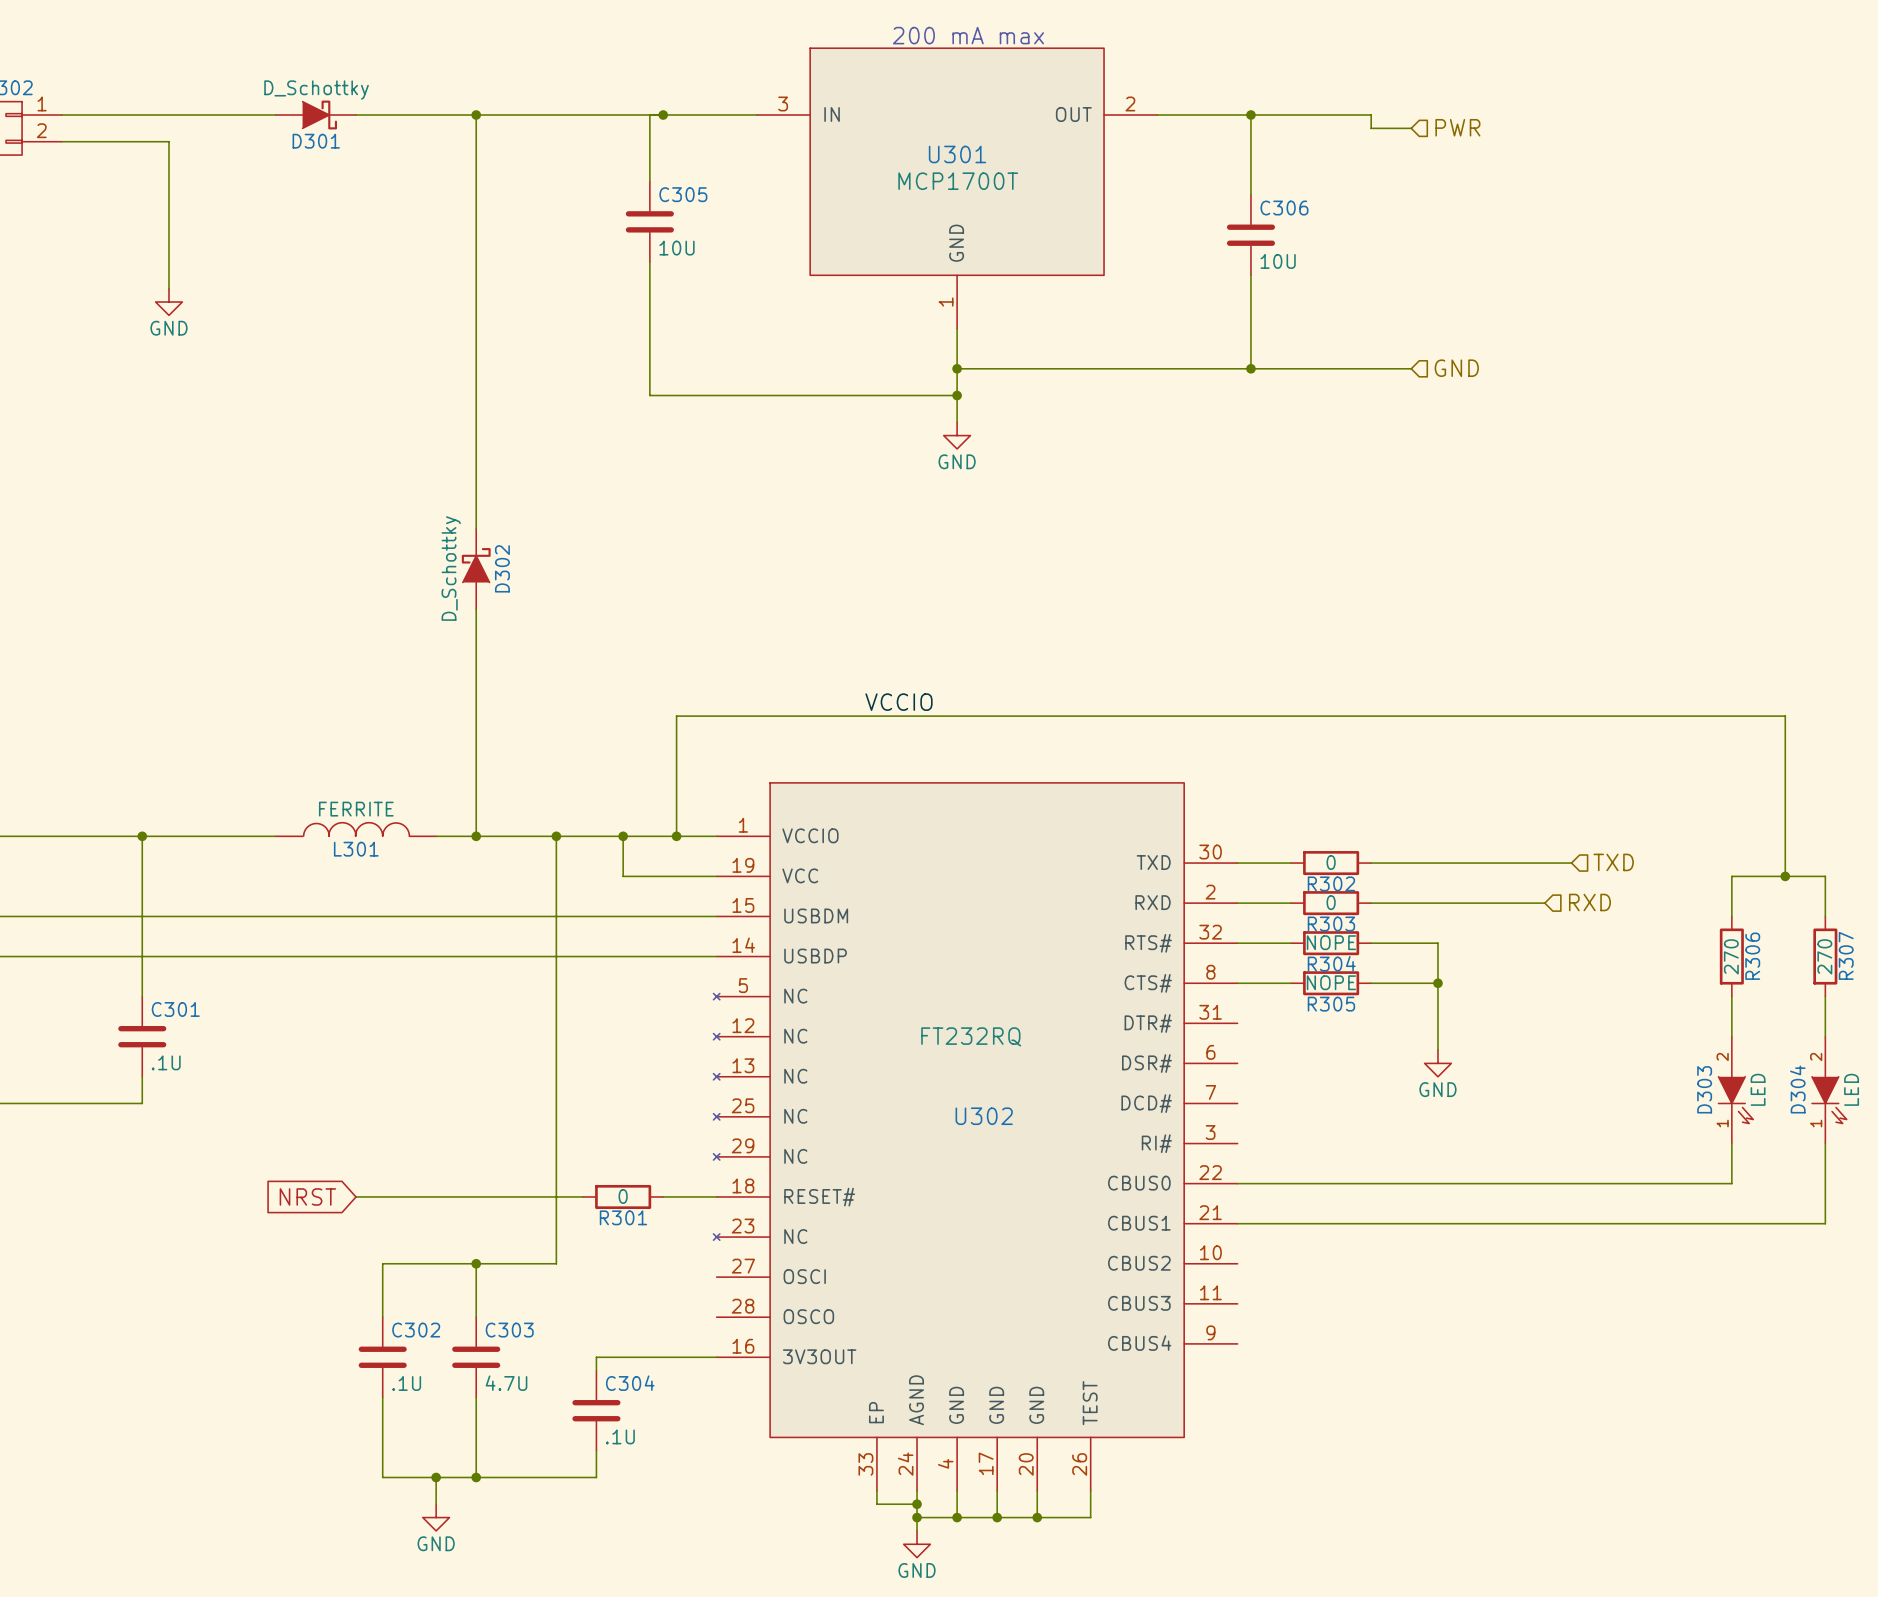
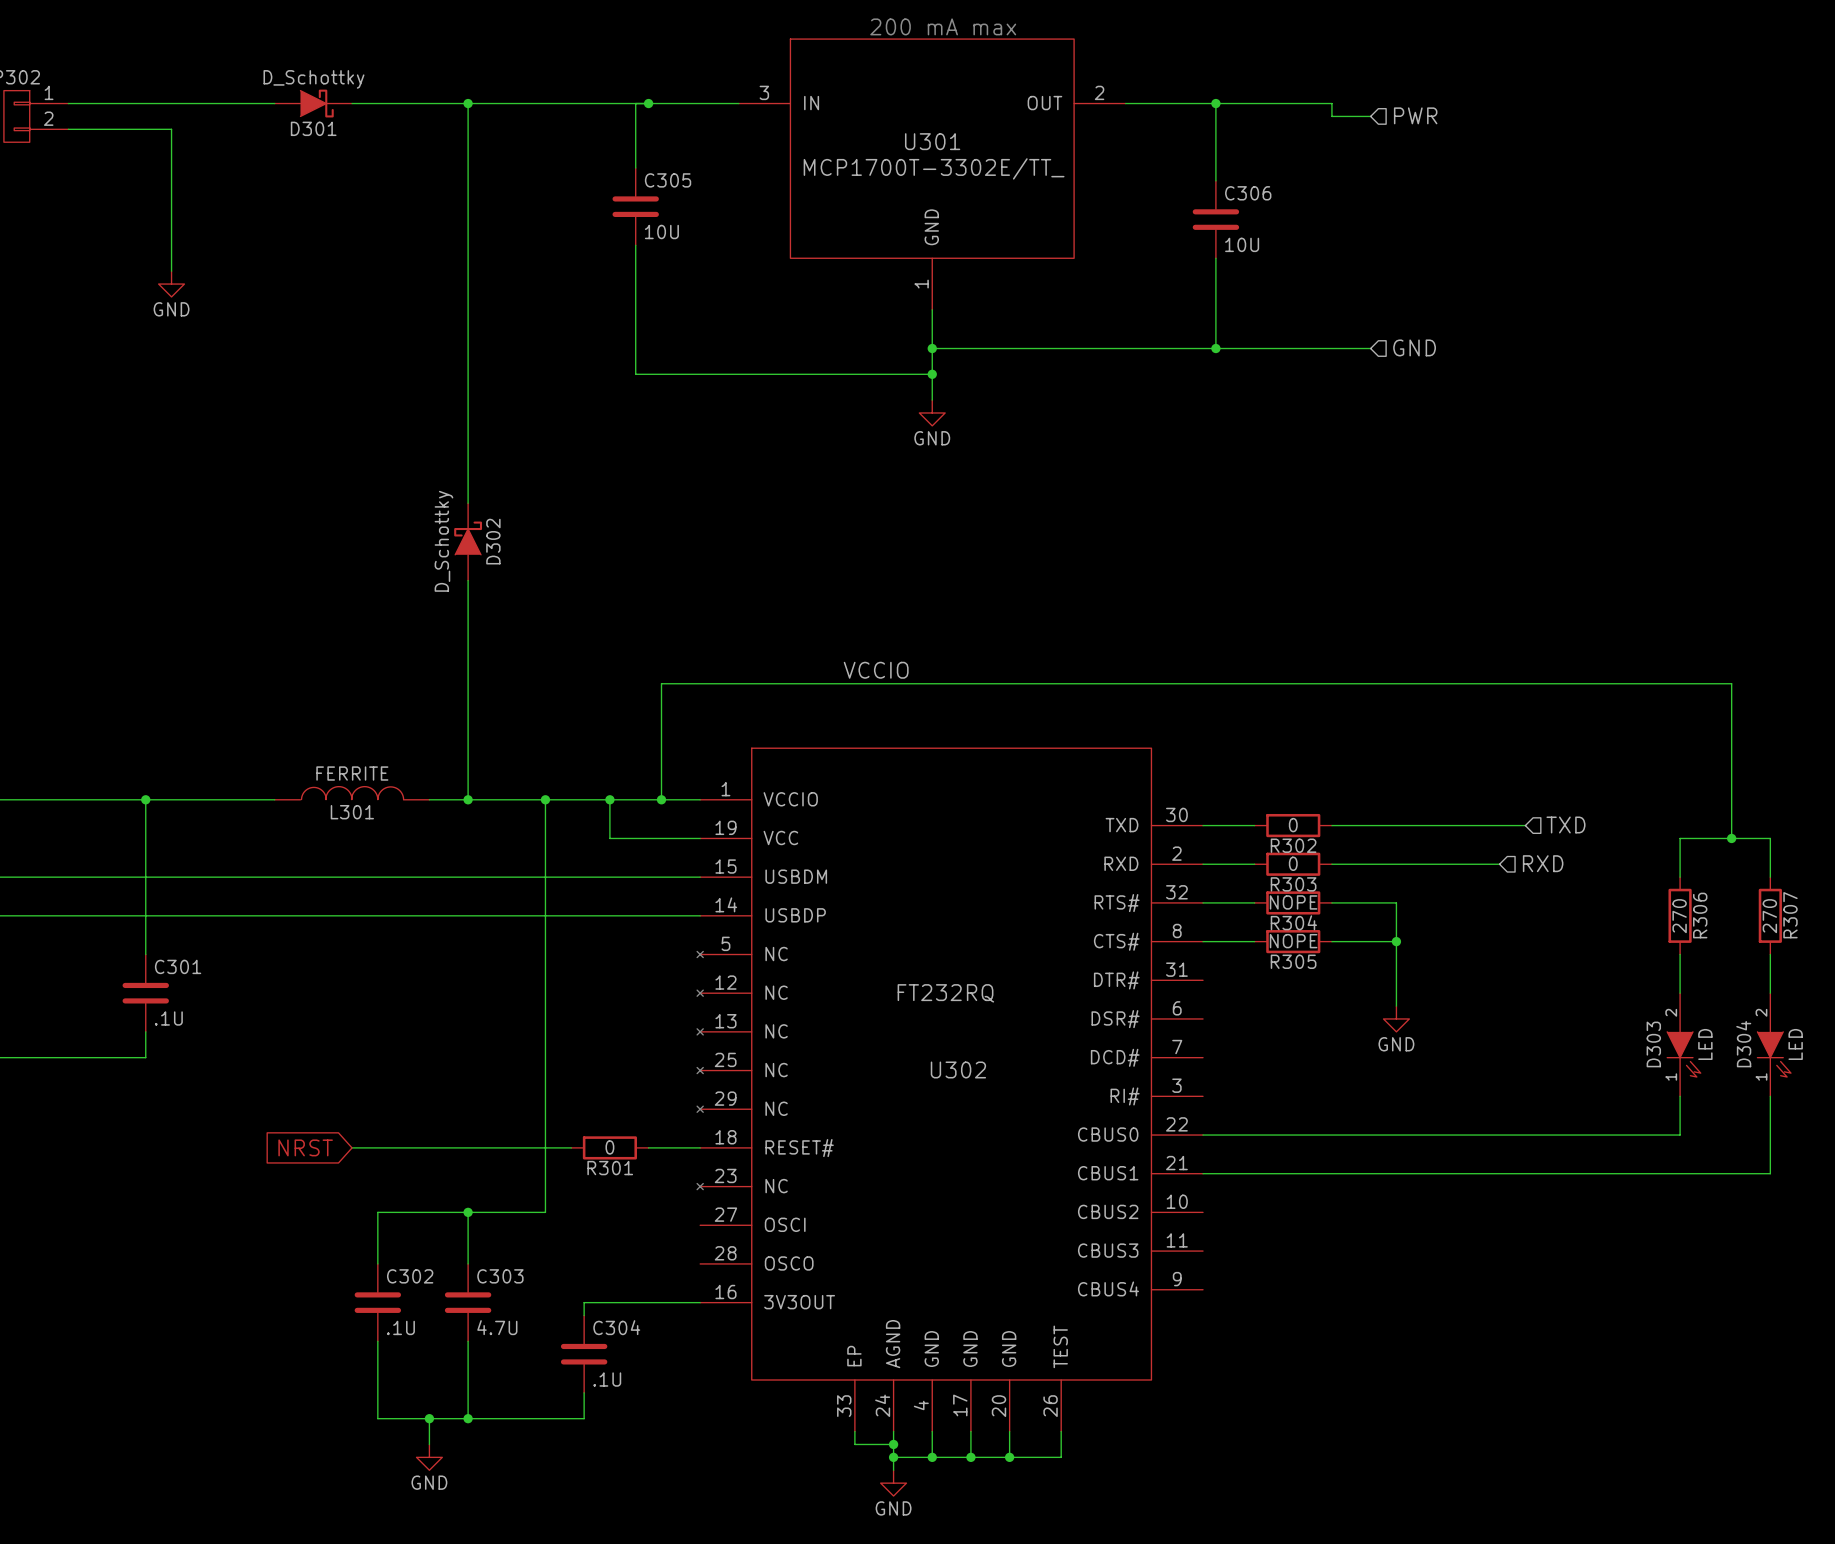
U301 value: MCP1700T (958, 181) -> MCP1700T-3302E/TT_ (934, 168)

